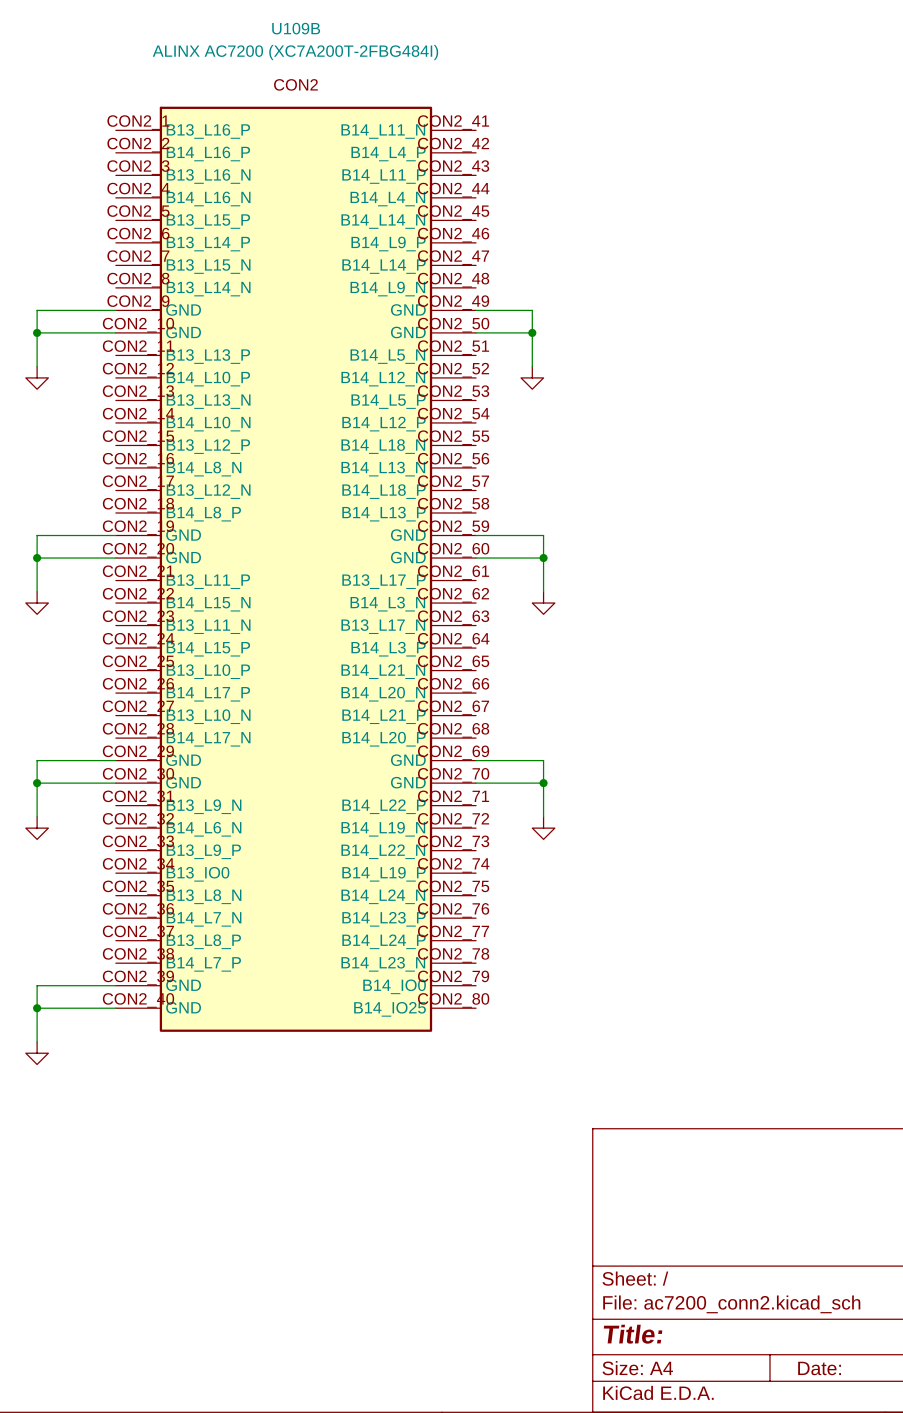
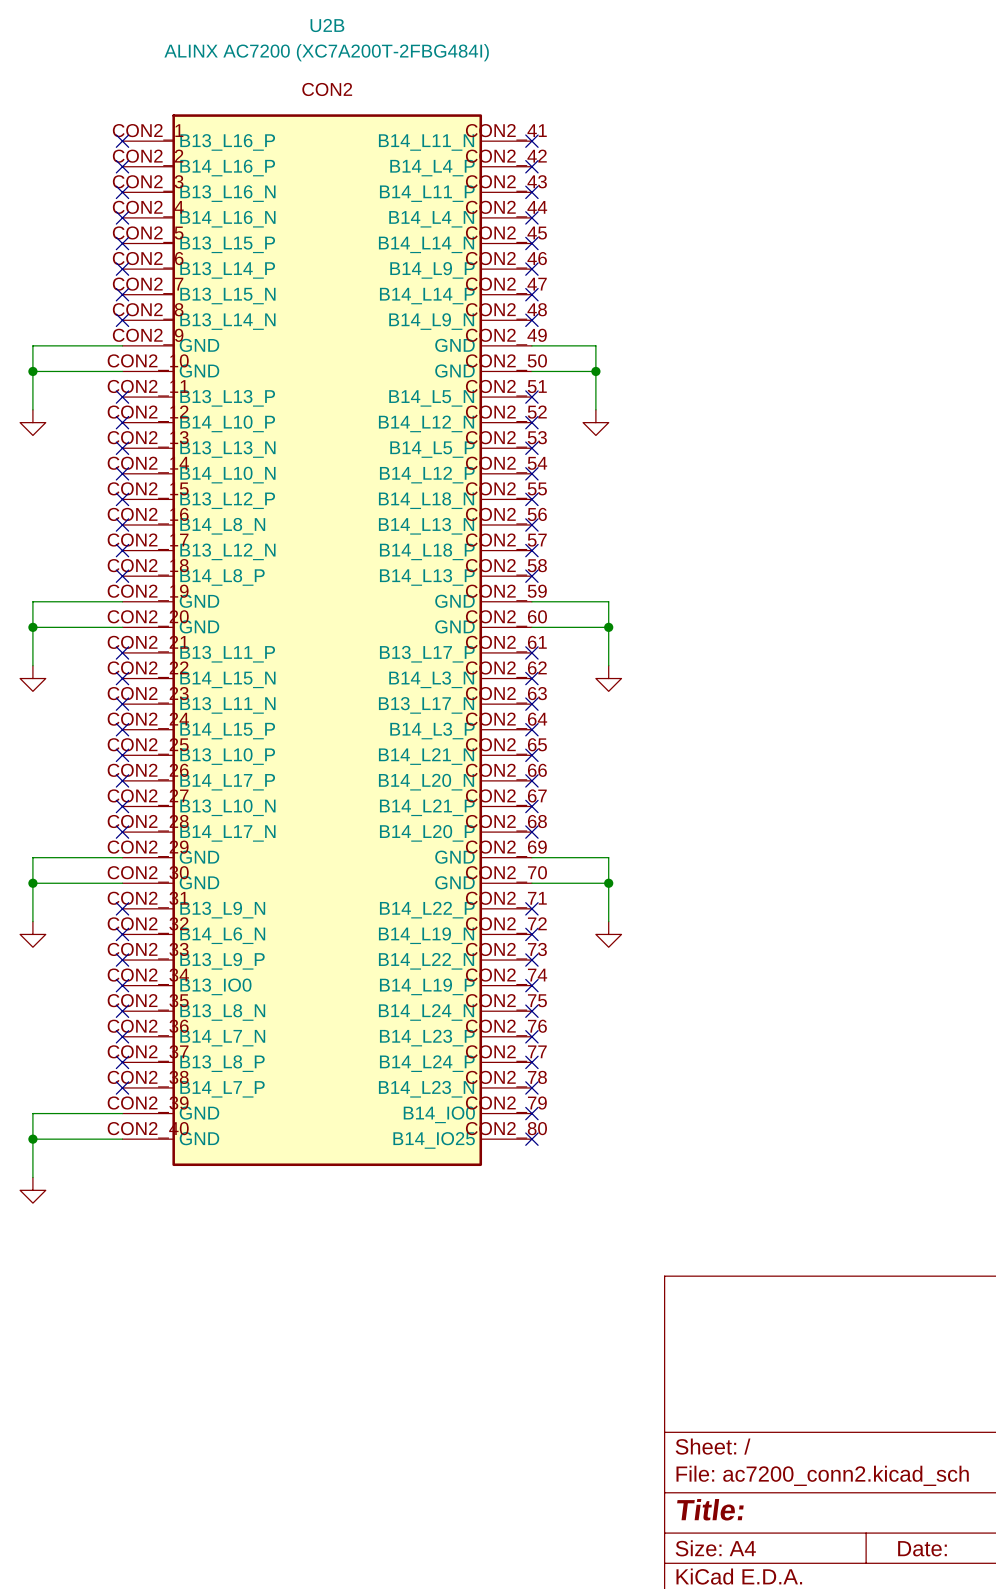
U109B name: U109B (296, 28) -> U2B (327, 25)
no-connect mark: none -> (122, 141)
no-connect mark: none -> (531, 141)
no-connect mark: none -> (122, 166)
no-connect mark: none -> (531, 166)
no-connect mark: none -> (122, 192)
no-connect mark: none -> (531, 192)
no-connect mark: none -> (122, 217)
no-connect mark: none -> (531, 217)
no-connect mark: none -> (122, 243)
no-connect mark: none -> (531, 243)
no-connect mark: none -> (122, 269)
no-connect mark: none -> (531, 269)
no-connect mark: none -> (122, 294)
no-connect mark: none -> (531, 294)
no-connect mark: none -> (122, 320)
no-connect mark: none -> (531, 320)
no-connect mark: none -> (122, 397)
no-connect mark: none -> (531, 397)
no-connect mark: none -> (122, 422)
no-connect mark: none -> (531, 422)
no-connect mark: none -> (122, 448)
no-connect mark: none -> (531, 448)
no-connect mark: none -> (122, 473)
no-connect mark: none -> (531, 473)
no-connect mark: none -> (122, 499)
no-connect mark: none -> (531, 499)
no-connect mark: none -> (122, 525)
no-connect mark: none -> (531, 525)
no-connect mark: none -> (122, 550)
no-connect mark: none -> (531, 550)
no-connect mark: none -> (122, 576)
no-connect mark: none -> (531, 576)
no-connect mark: none -> (122, 652)
no-connect mark: none -> (531, 652)
no-connect mark: none -> (122, 678)
no-connect mark: none -> (531, 678)
no-connect mark: none -> (122, 704)
no-connect mark: none -> (531, 704)
no-connect mark: none -> (122, 729)
no-connect mark: none -> (531, 729)
no-connect mark: none -> (122, 755)
no-connect mark: none -> (531, 755)
no-connect mark: none -> (122, 780)
no-connect mark: none -> (531, 780)
no-connect mark: none -> (122, 806)
no-connect mark: none -> (531, 806)
no-connect mark: none -> (122, 832)
no-connect mark: none -> (531, 832)
no-connect mark: none -> (122, 908)
no-connect mark: none -> (531, 908)
no-connect mark: none -> (122, 934)
no-connect mark: none -> (531, 934)
no-connect mark: none -> (122, 960)
no-connect mark: none -> (531, 960)
no-connect mark: none -> (122, 985)
no-connect mark: none -> (531, 985)
no-connect mark: none -> (122, 1011)
no-connect mark: none -> (531, 1011)
no-connect mark: none -> (122, 1036)
no-connect mark: none -> (531, 1036)
no-connect mark: none -> (122, 1062)
no-connect mark: none -> (531, 1062)
no-connect mark: none -> (122, 1087)
no-connect mark: none -> (531, 1087)
no-connect mark: none -> (531, 1113)
no-connect mark: none -> (531, 1139)

